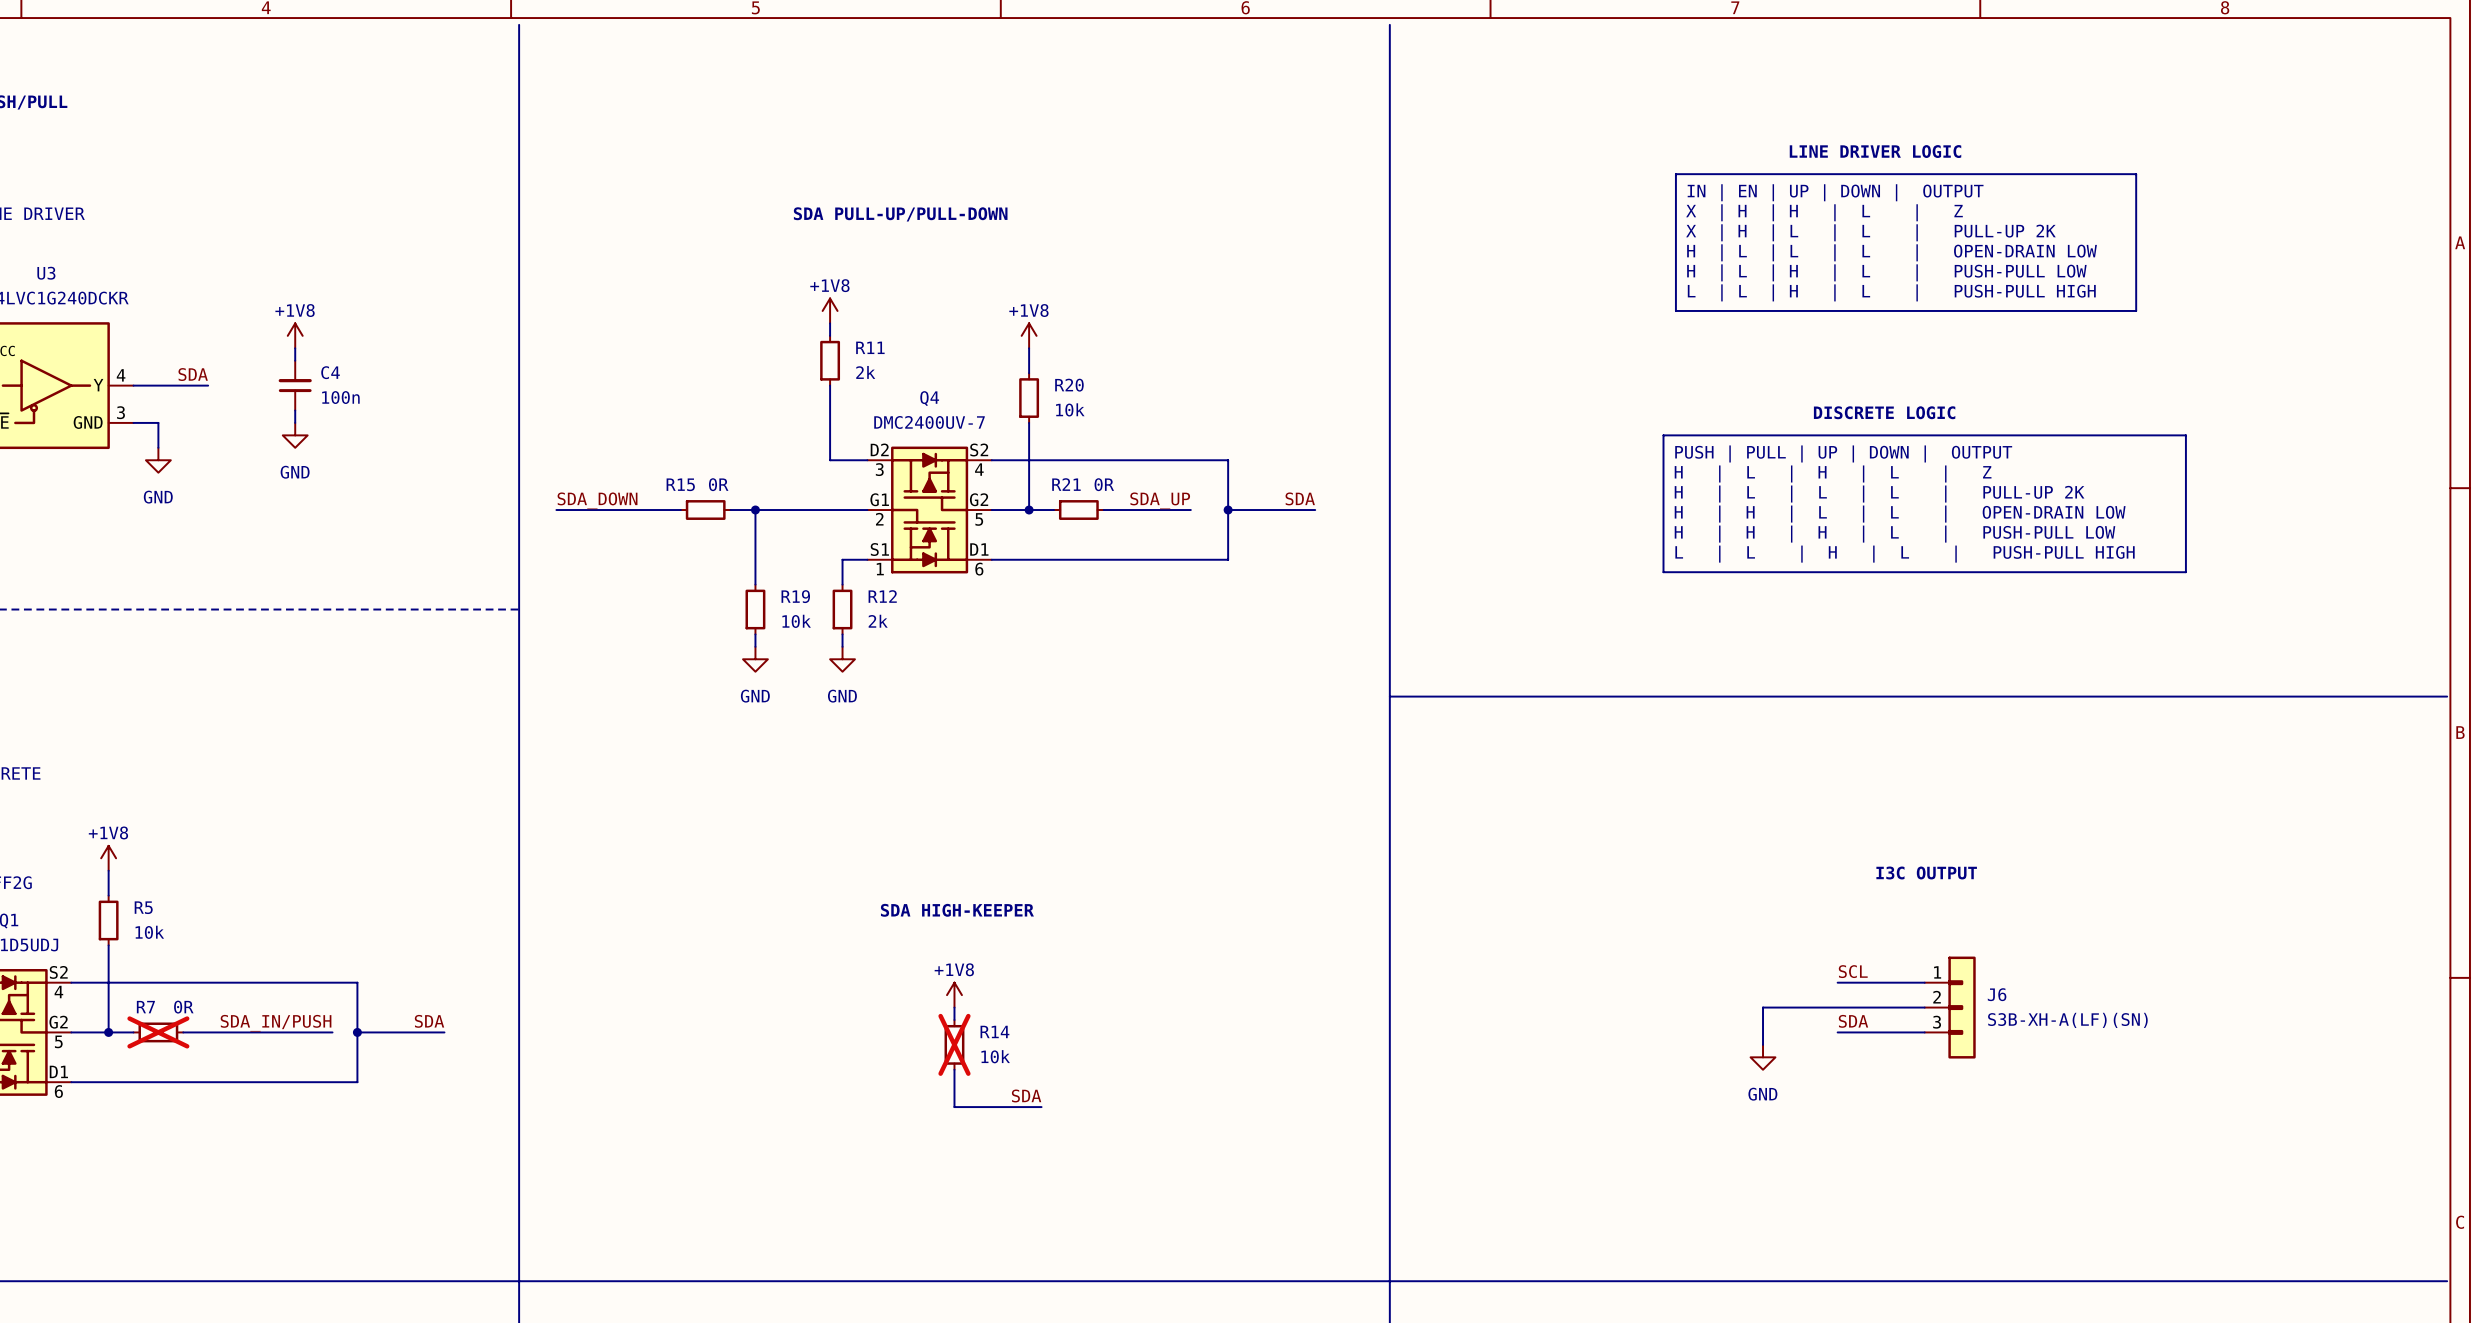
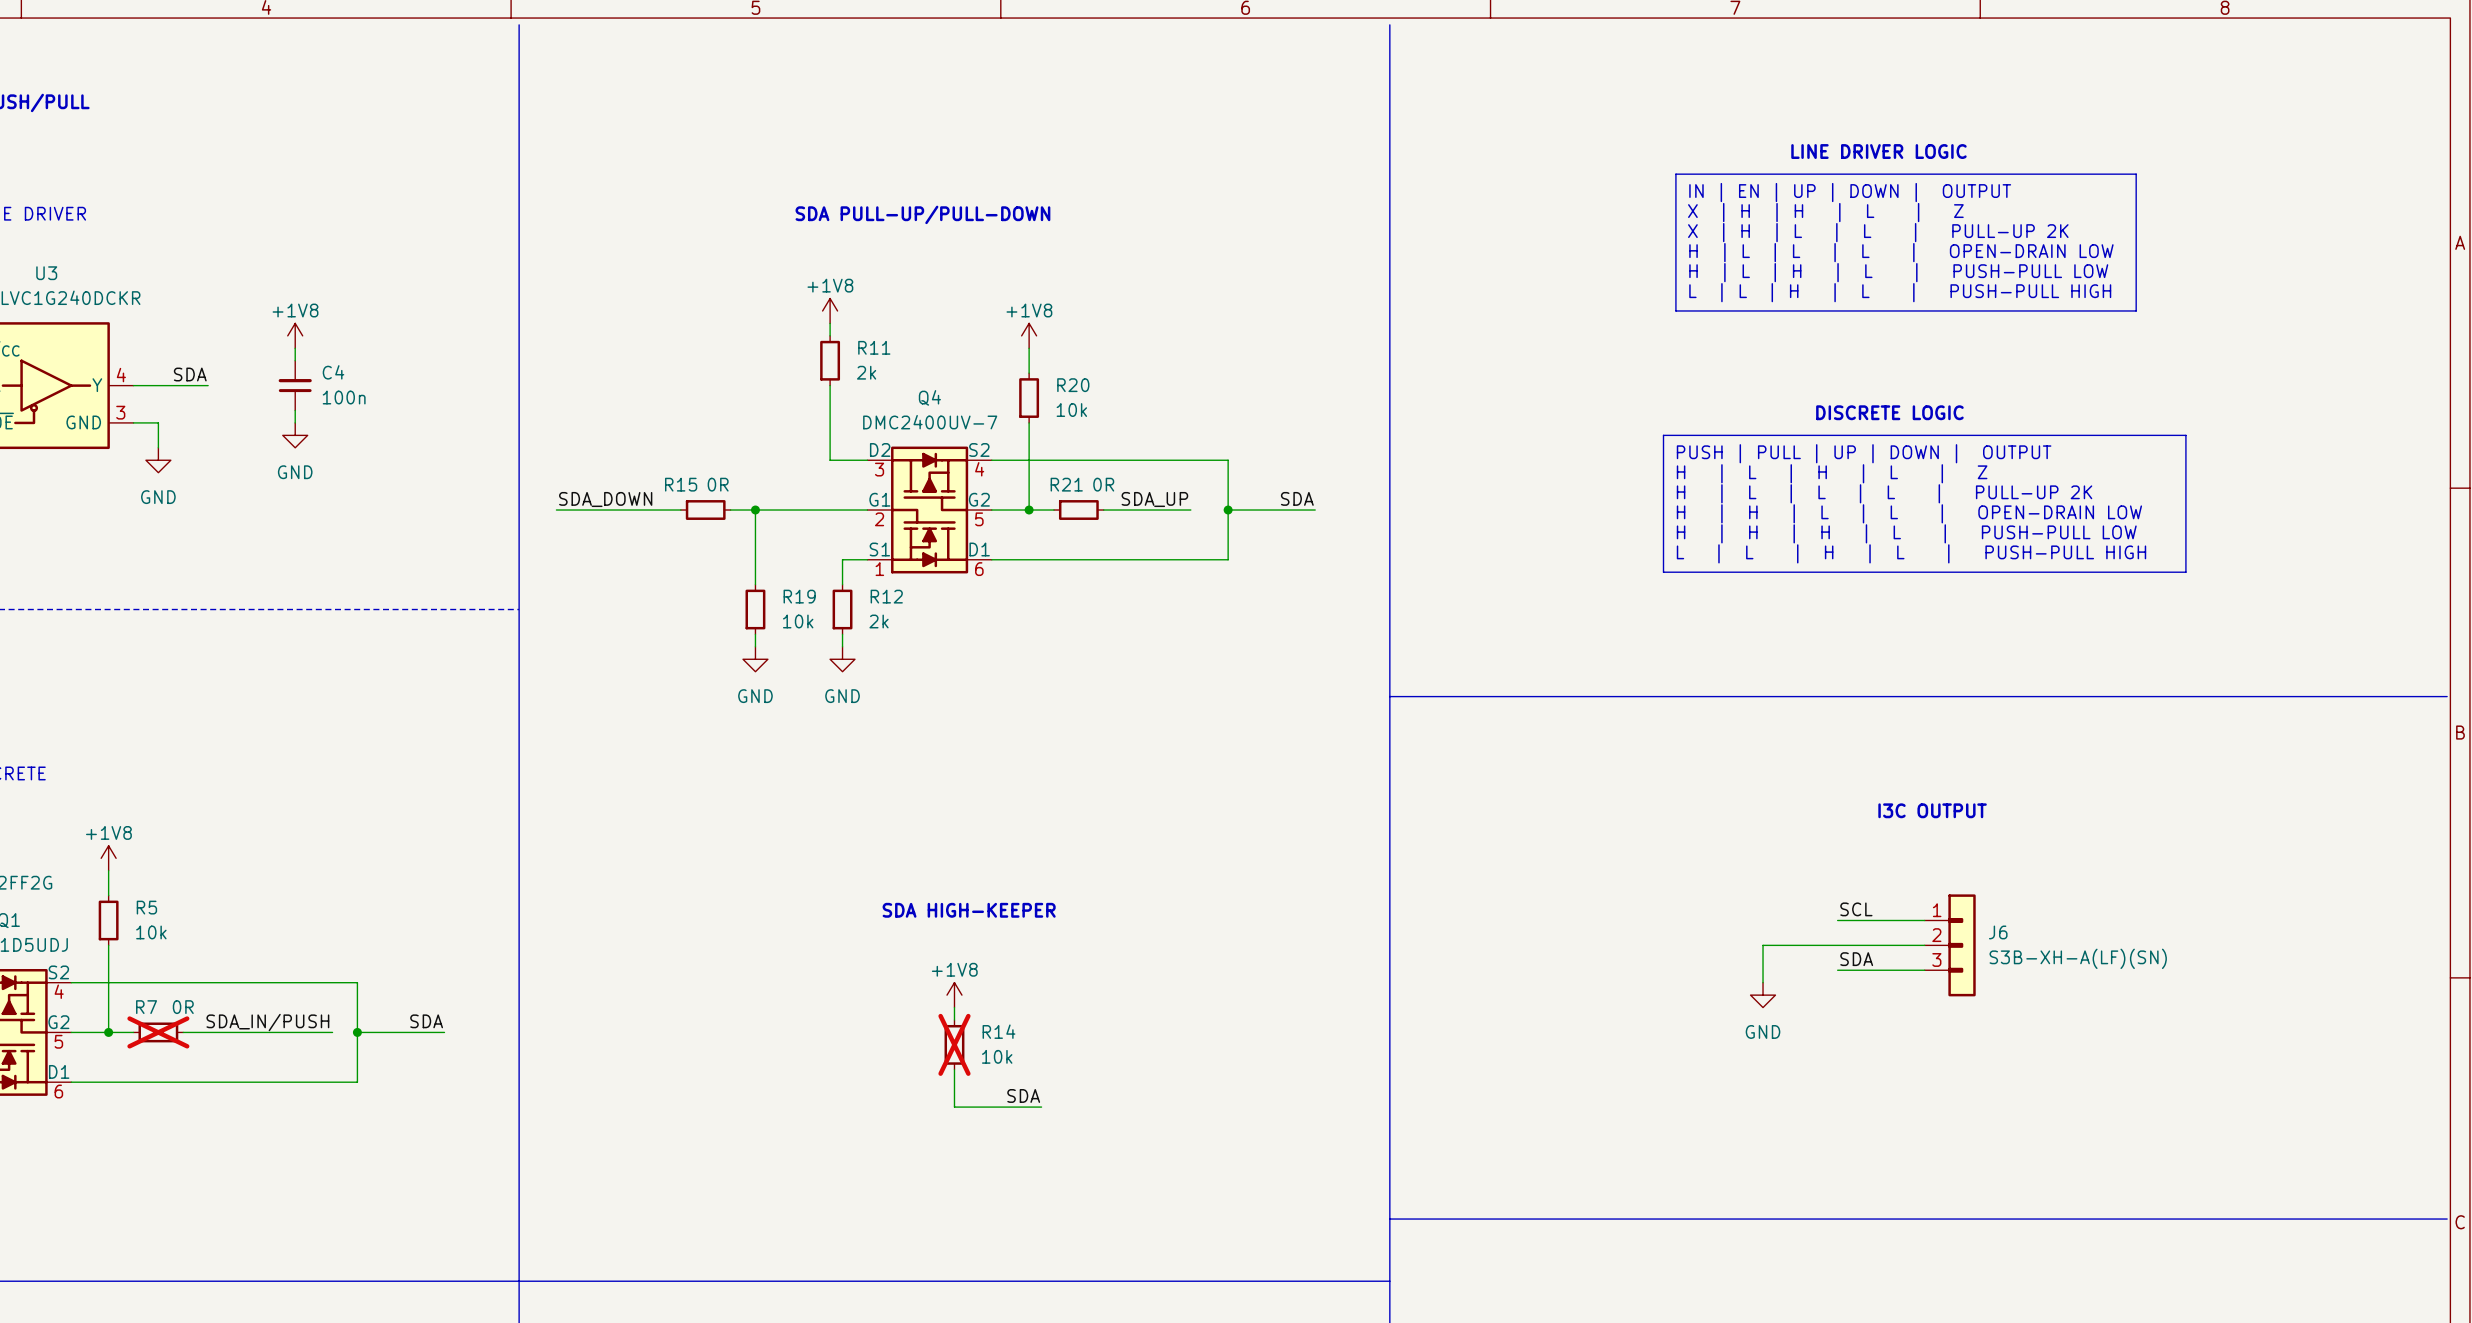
text position: I3C OUTPUT (1926, 872) -> I3C OUTPUT (1932, 810)
label position: SCL (1853, 971) -> SCL (1856, 909)
wire: (1837, 982) (1924, 982) -> (1837, 920) (1924, 920)
wire: (1924, 1007) (1763, 1007) (1763, 1044) -> (1924, 945) (1763, 945) (1763, 982)
J6 position: (1950, 1007) -> (1950, 945)
label position: SDA (1853, 1021) -> SDA (1856, 959)
wire: (1837, 1032) (1924, 1032) -> (1837, 970) (1924, 970)
power symbol position: GND (1763, 1057) -> GND (1763, 995)
line: (1389, 1281) (2447, 1281) -> (1389, 1219) (2447, 1219)

